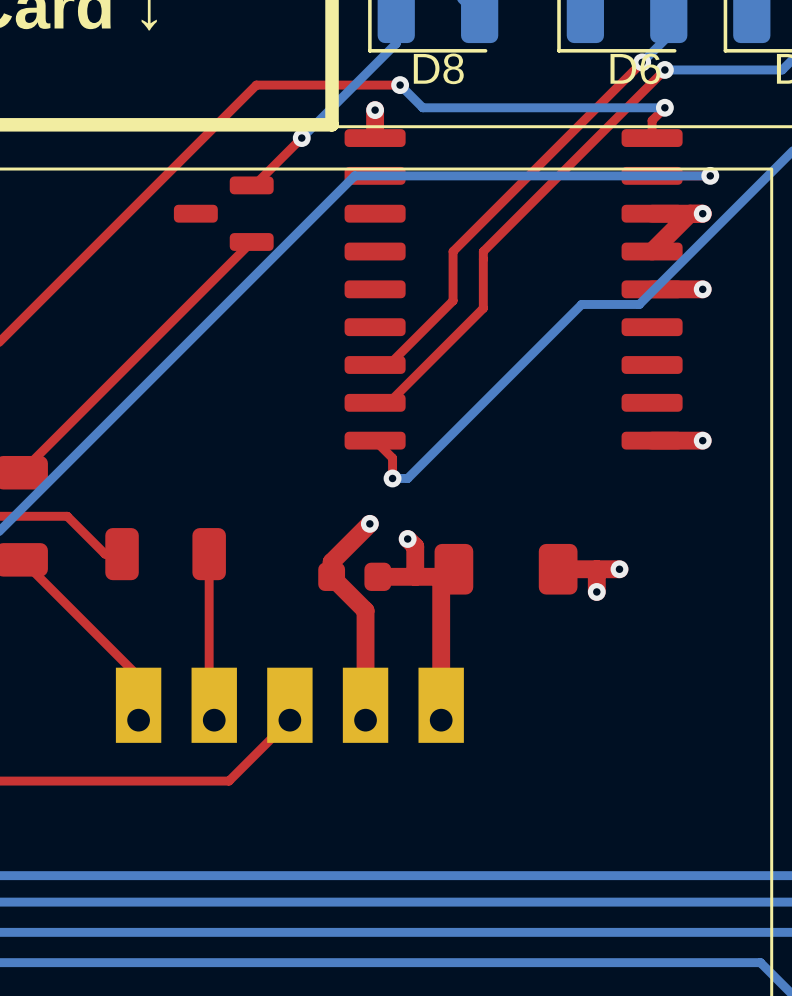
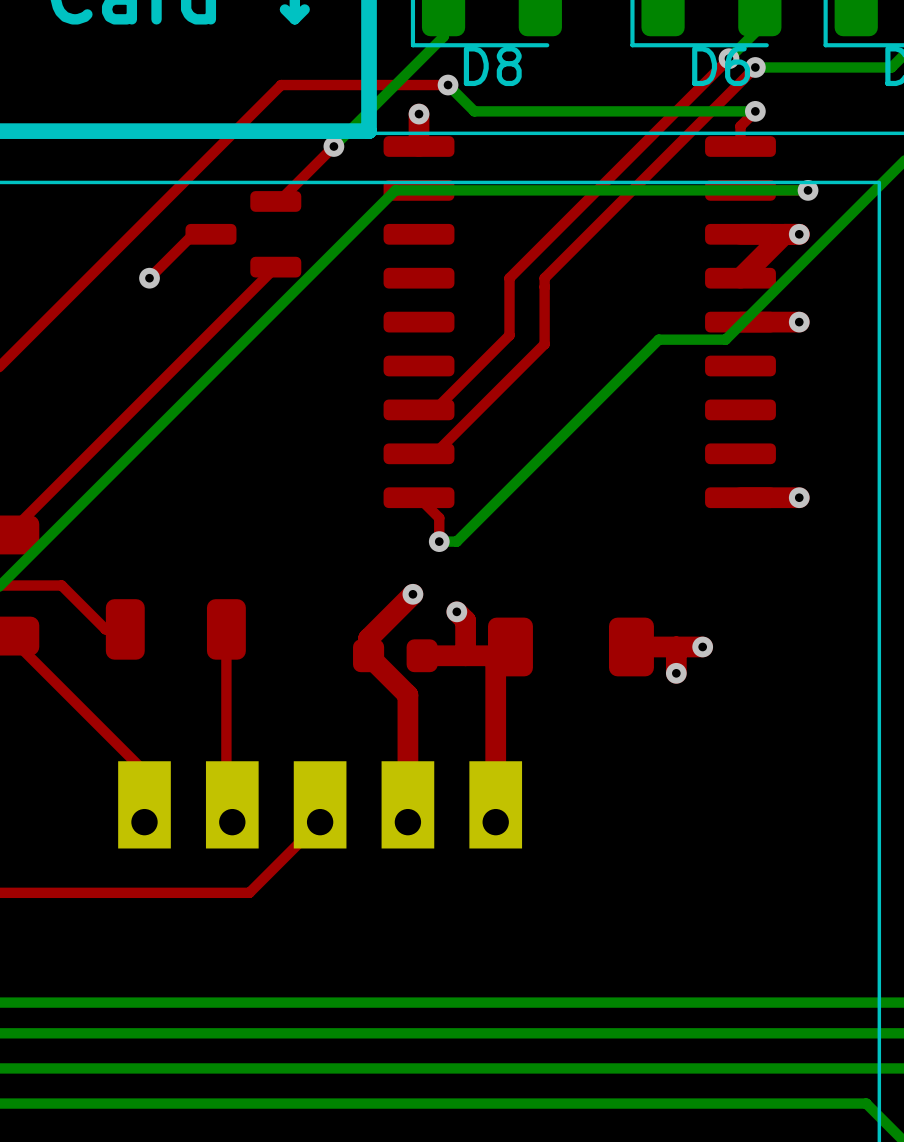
top track: none -> (210, 234) (193, 234) (149, 278)
via: none -> (149, 278)

